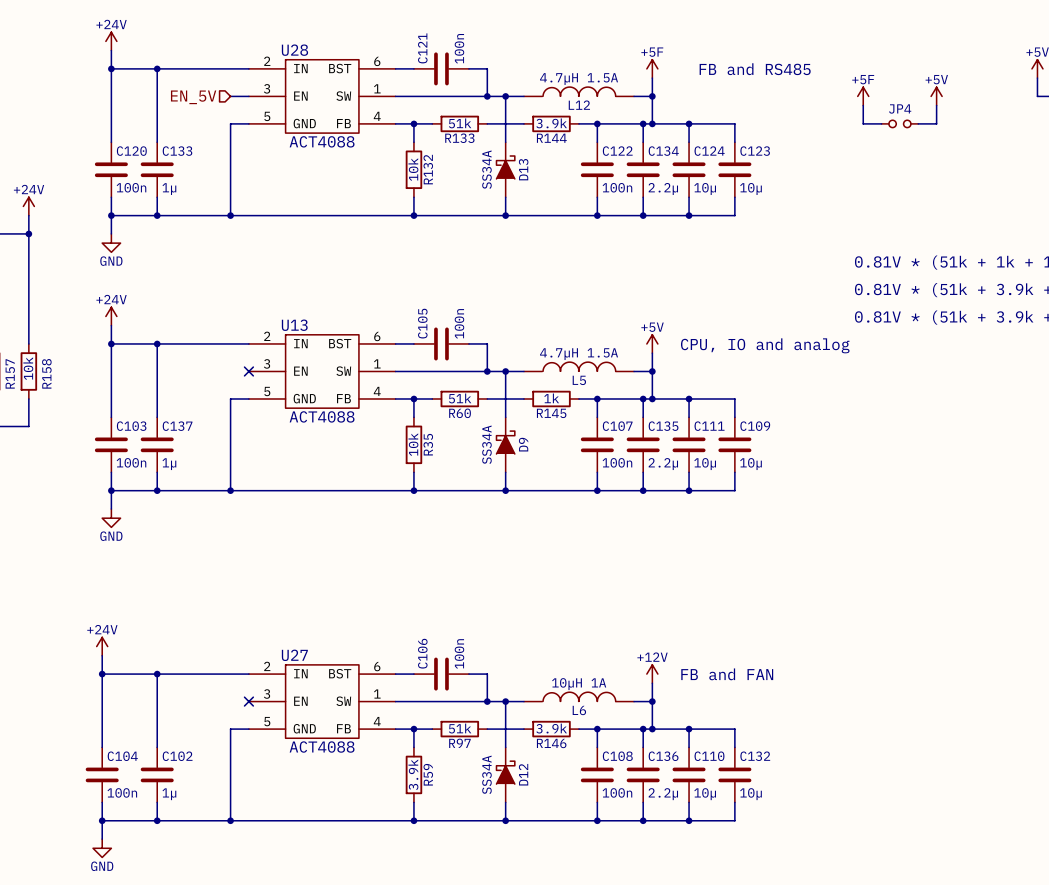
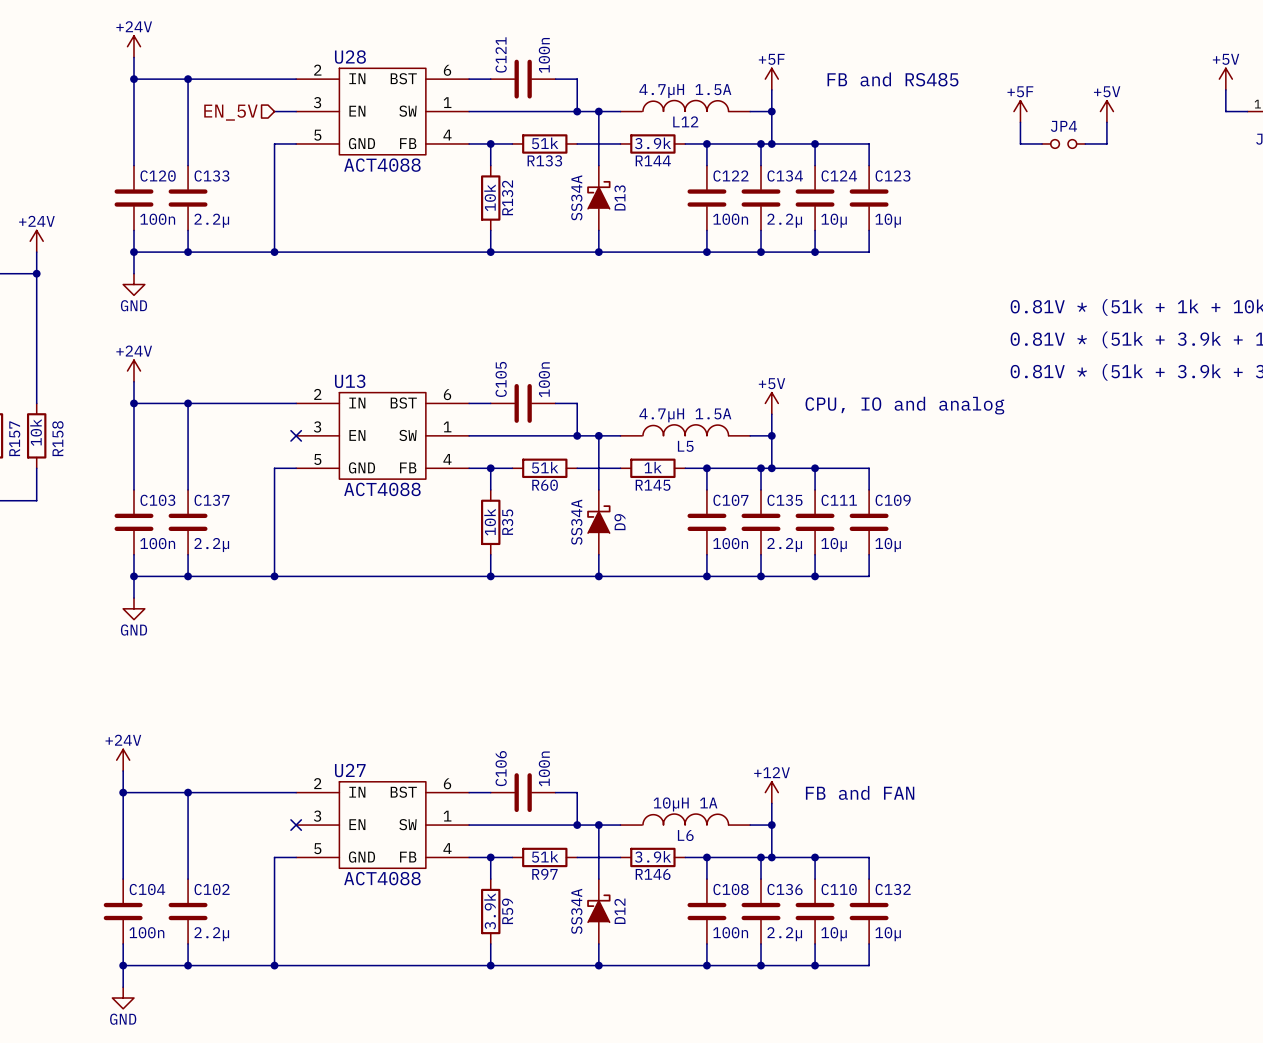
C133 value: 1µ (169, 189) -> 2.2µ (211, 220)
C137 value: 1µ (169, 464) -> 2.2µ (211, 545)
C102 value: 1µ (169, 794) -> 2.2µ (211, 934)

